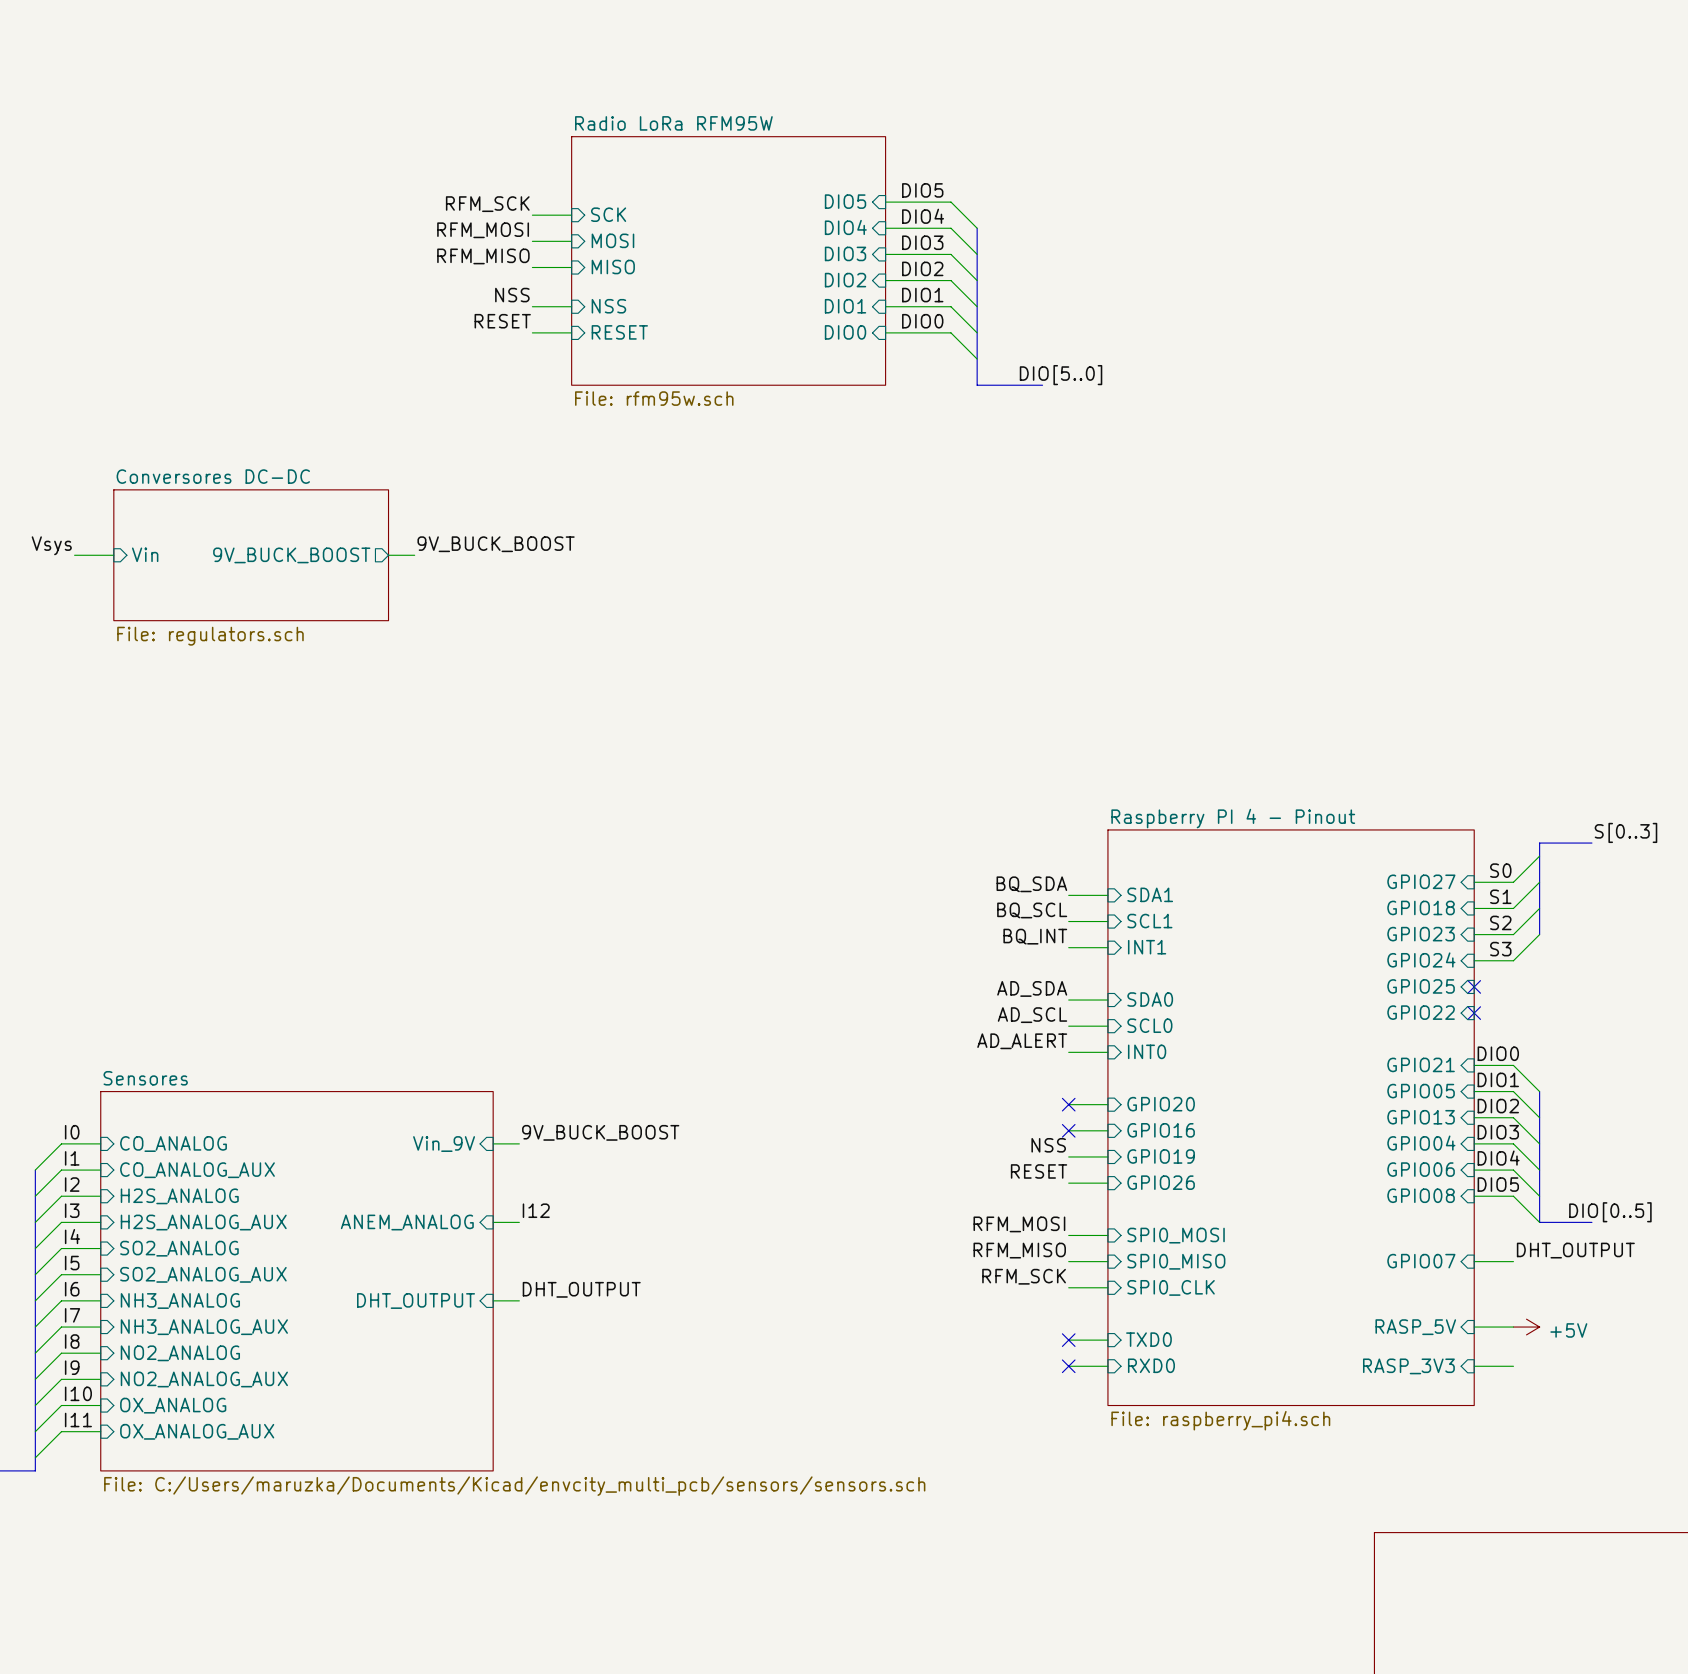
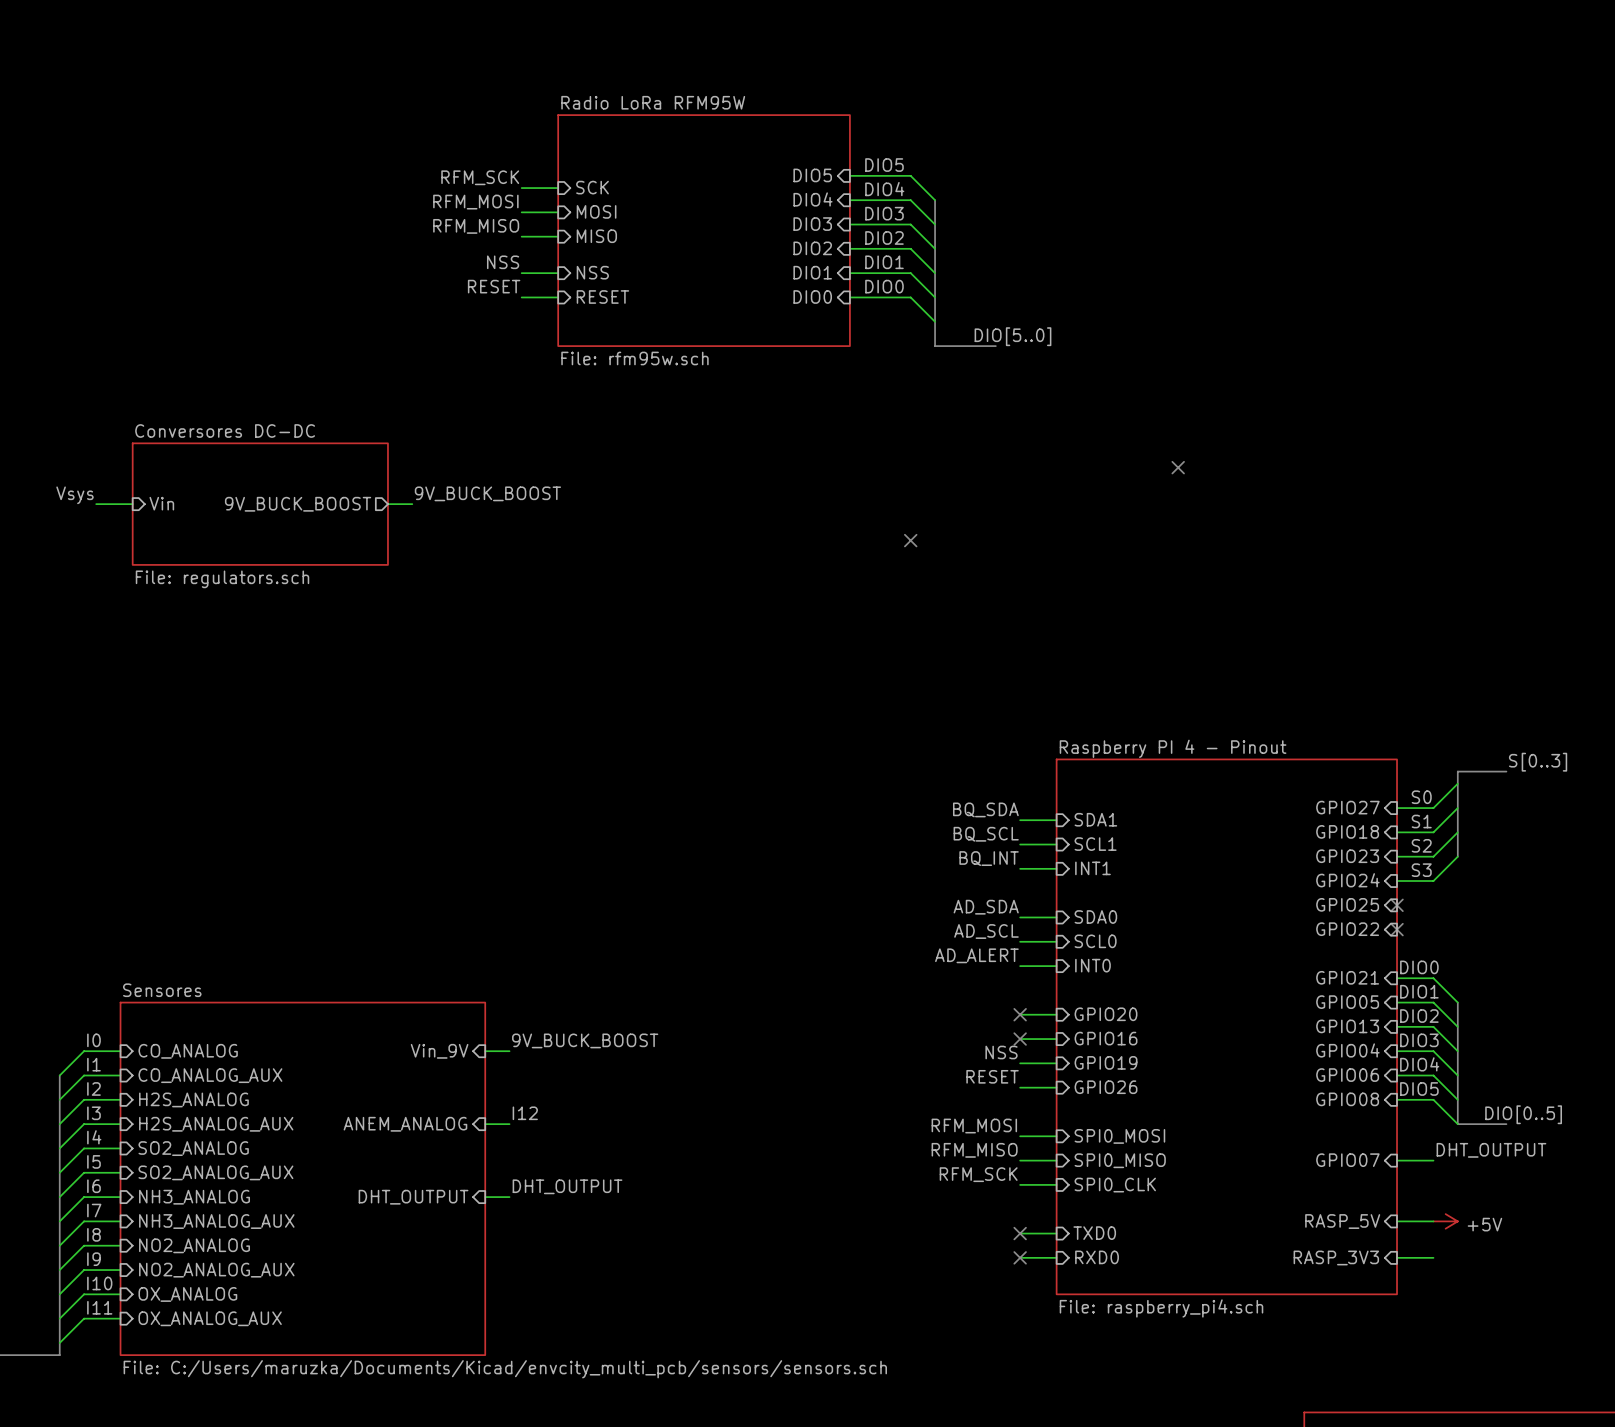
no-connect mark: none -> (1178, 467)
no-connect mark: none -> (910, 540)

